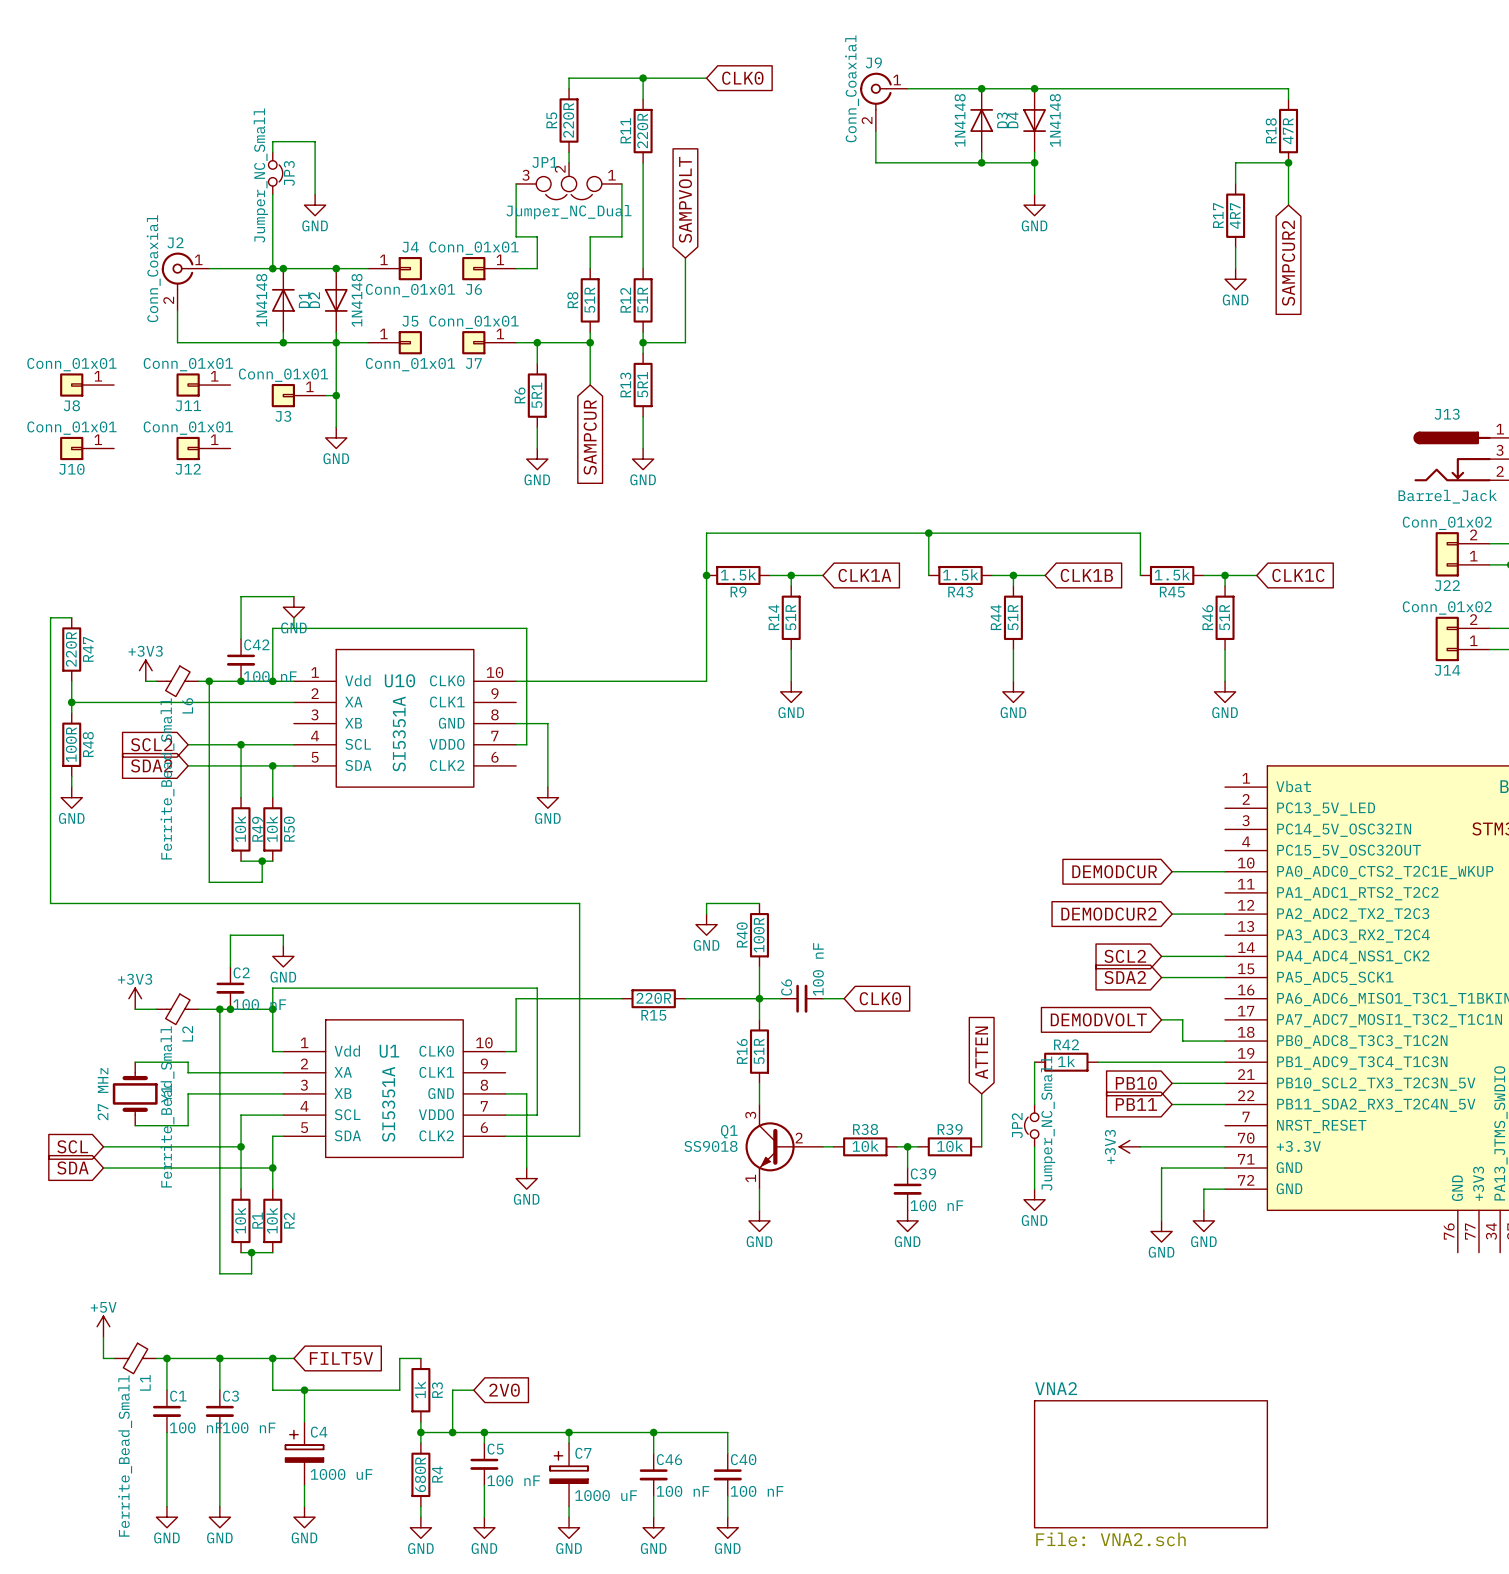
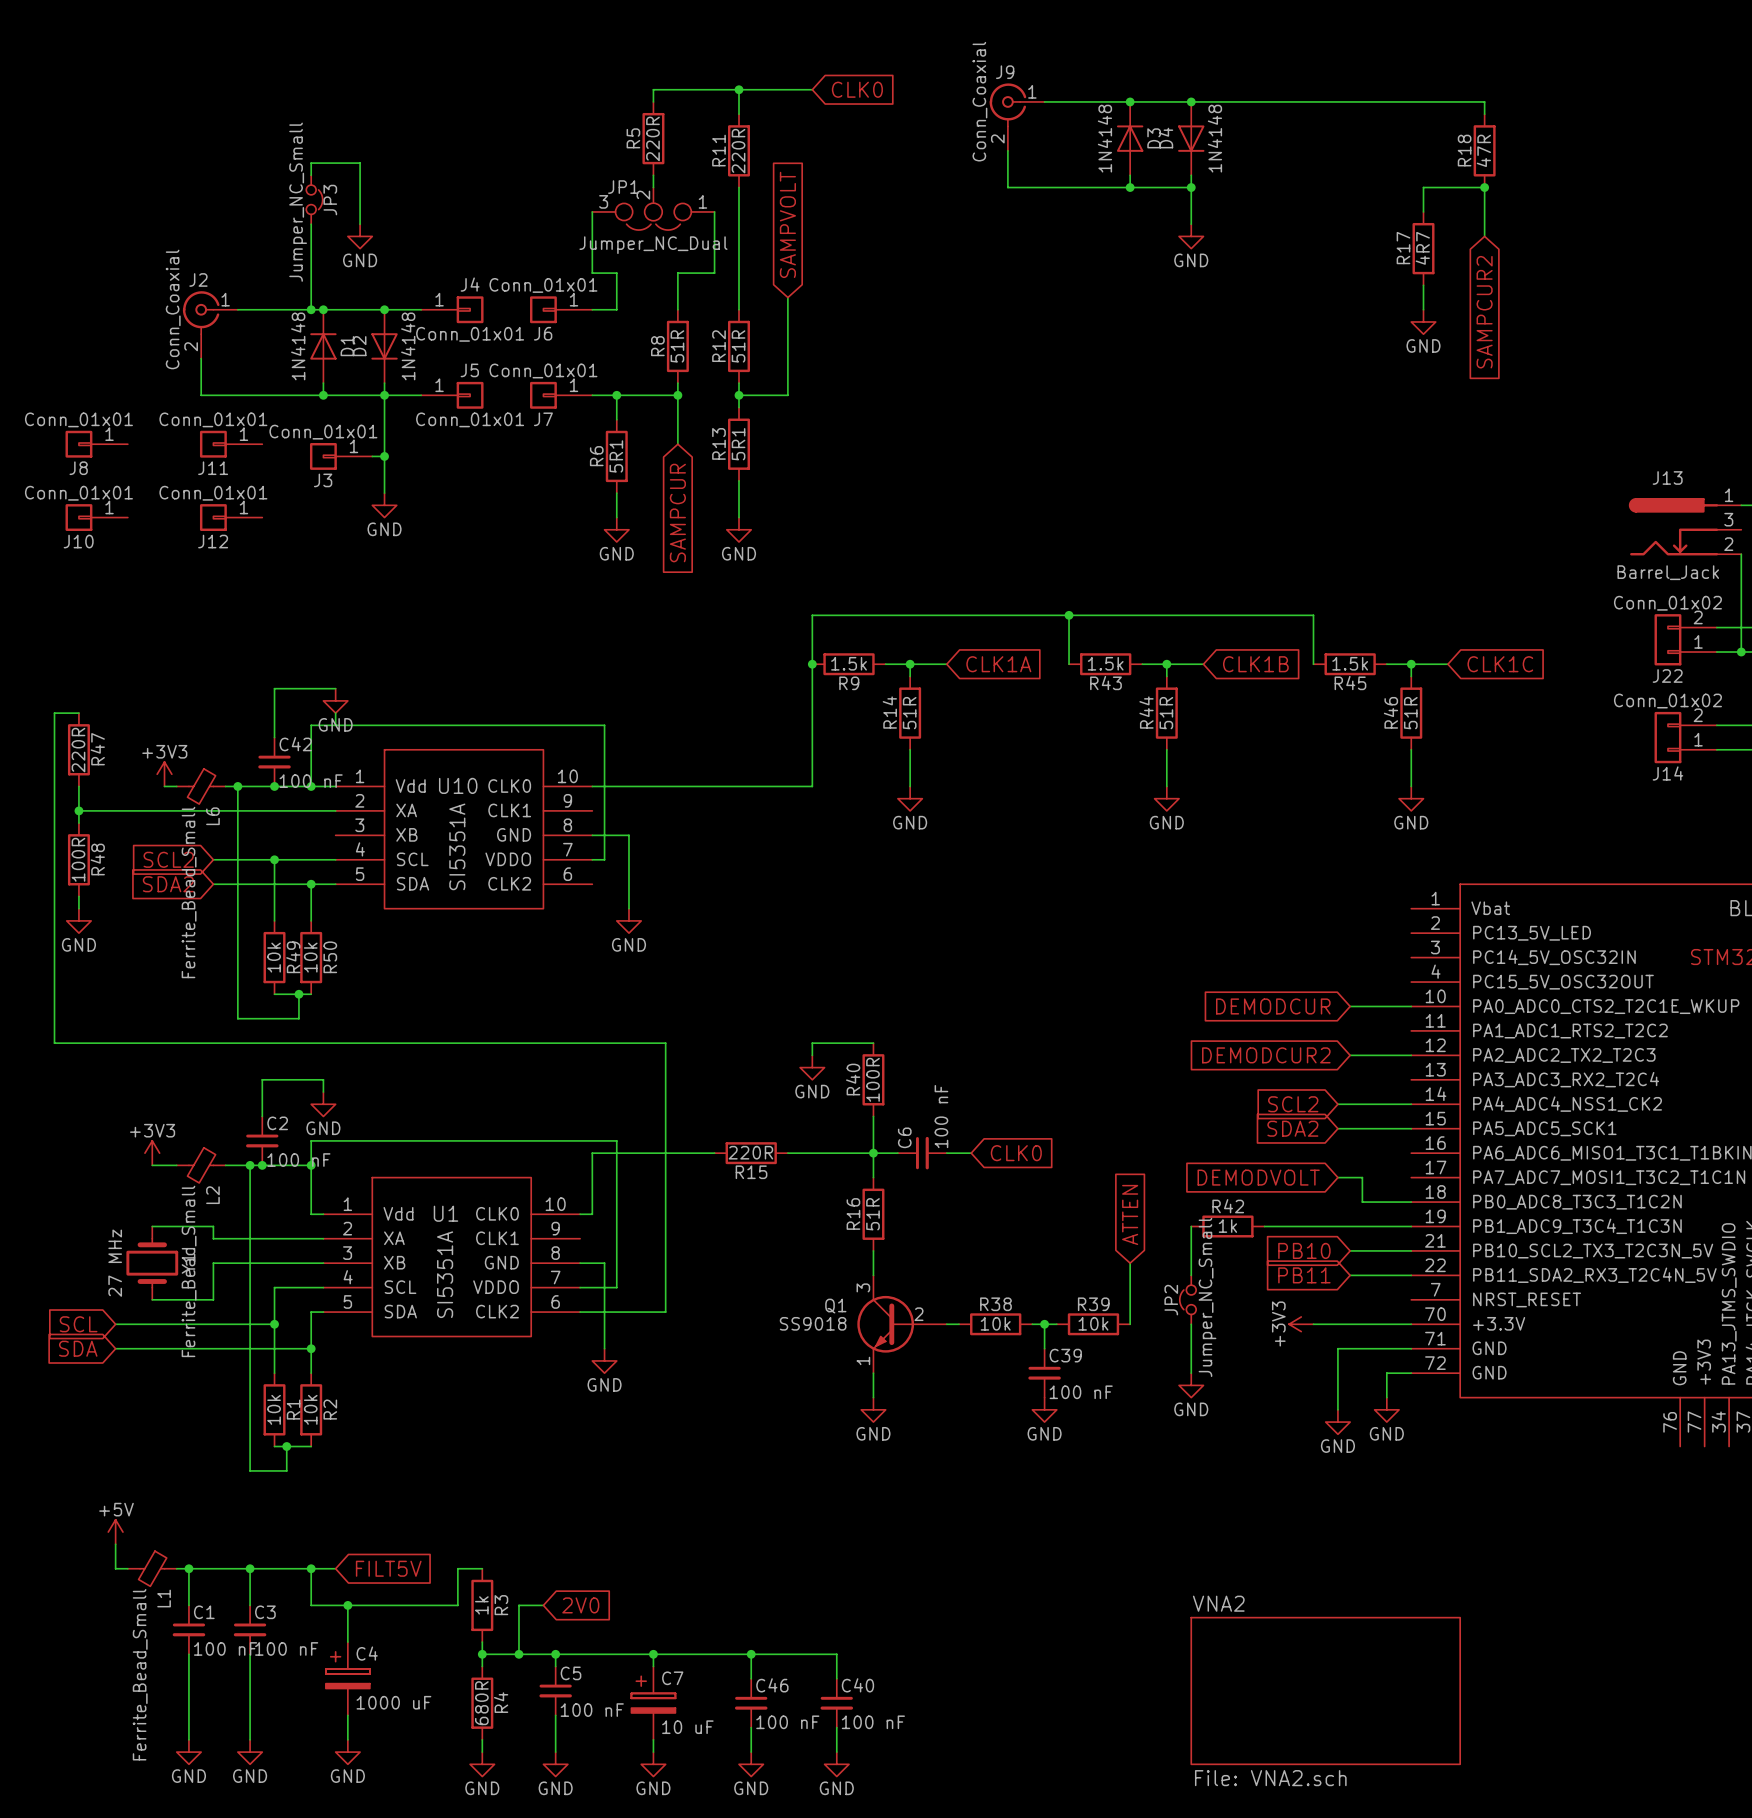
C7 value: 1000 uF (606, 1495) -> 10 uF (687, 1727)

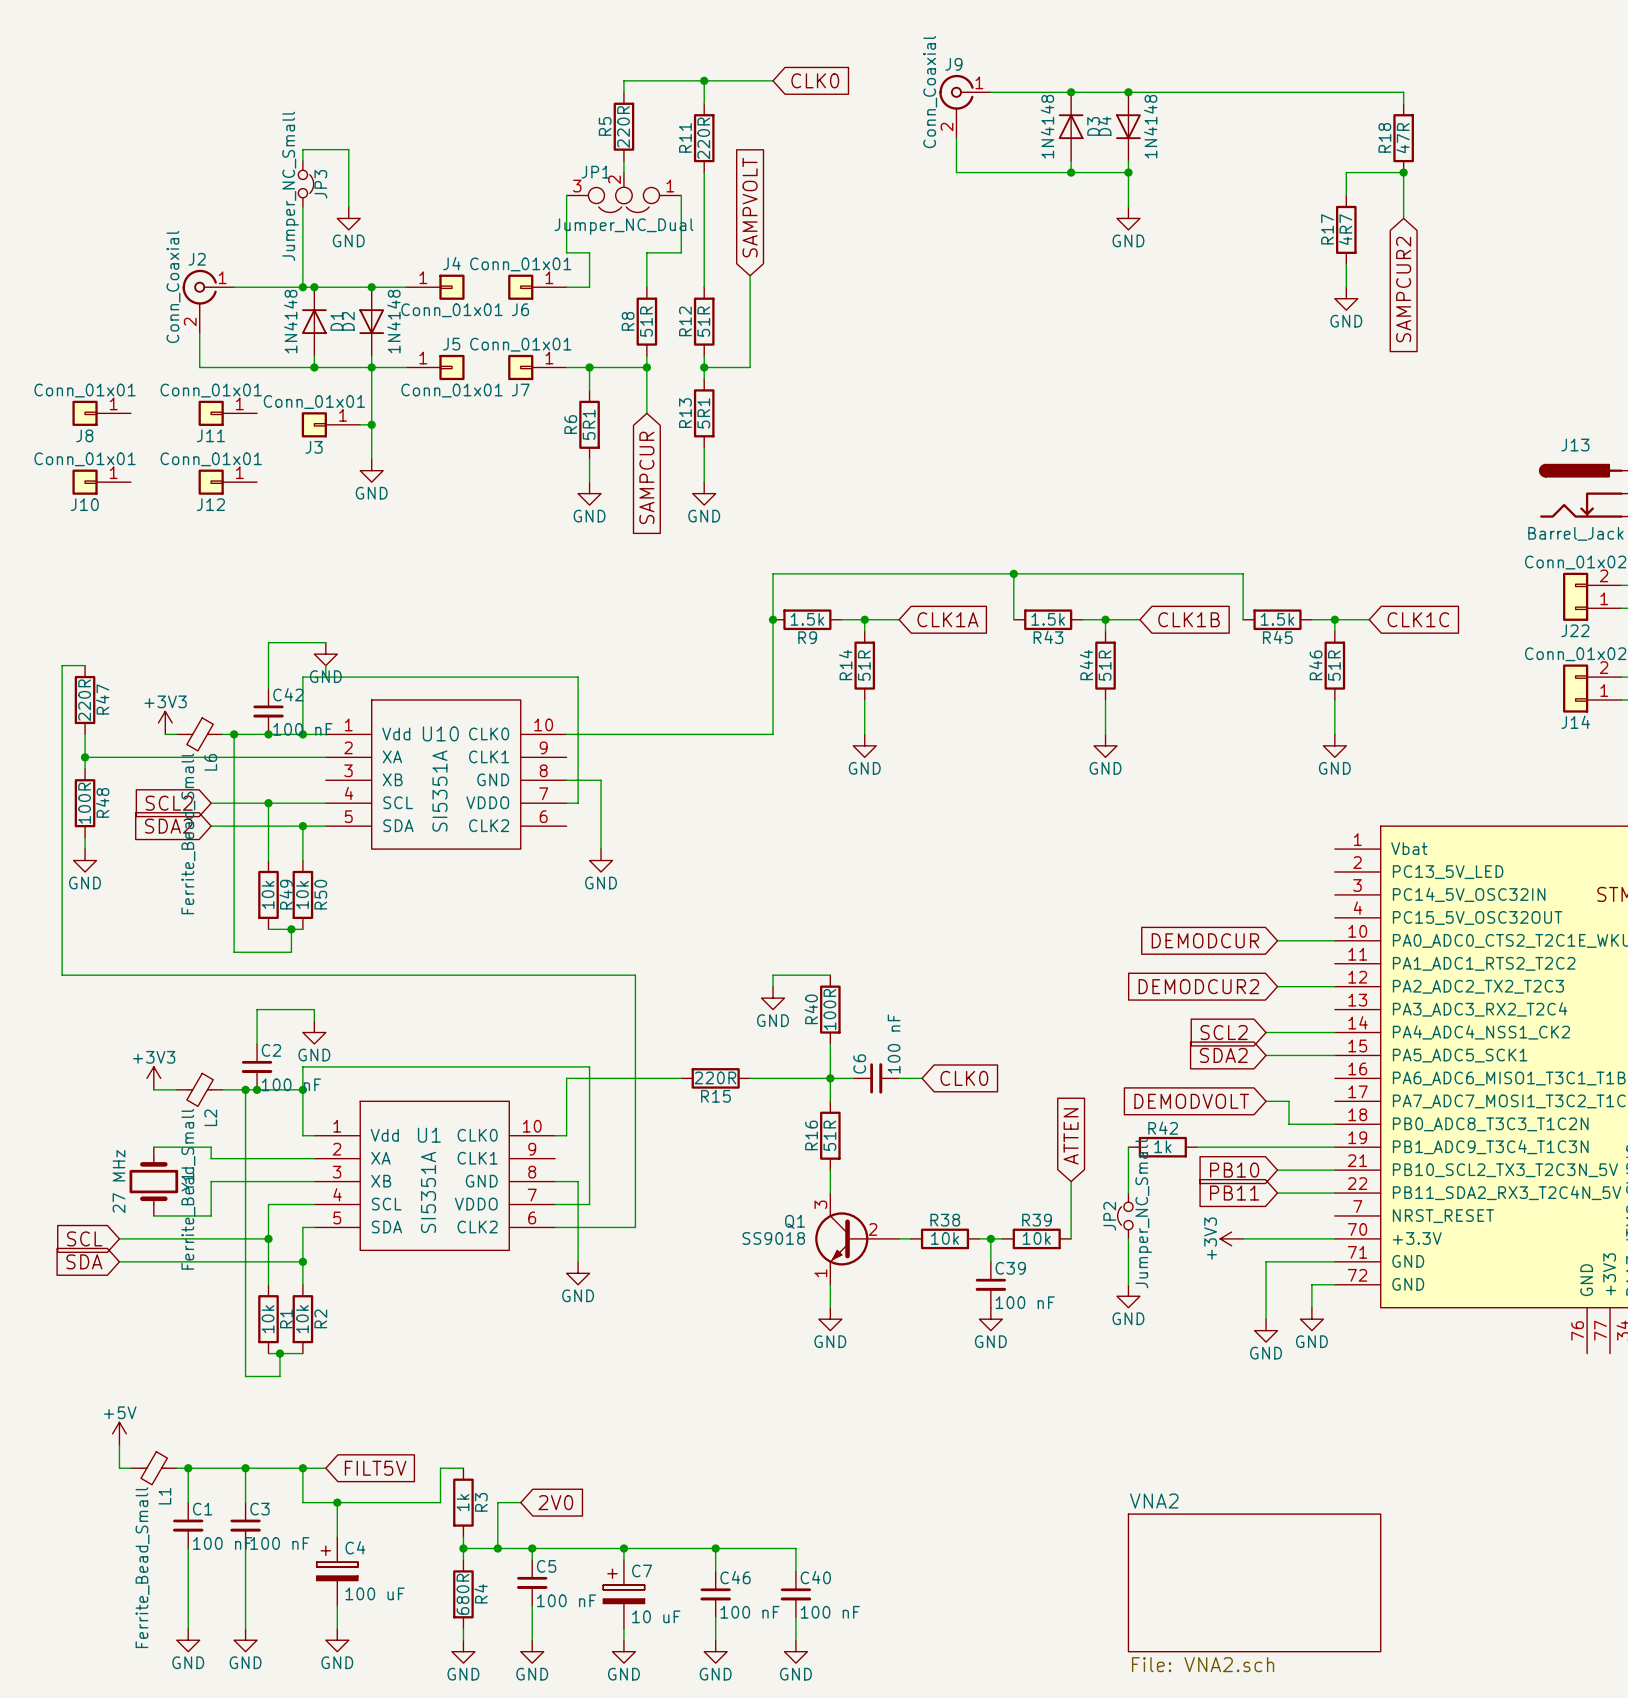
C4 value: 1000 uF (393, 1702) -> 100 uF (375, 1593)

